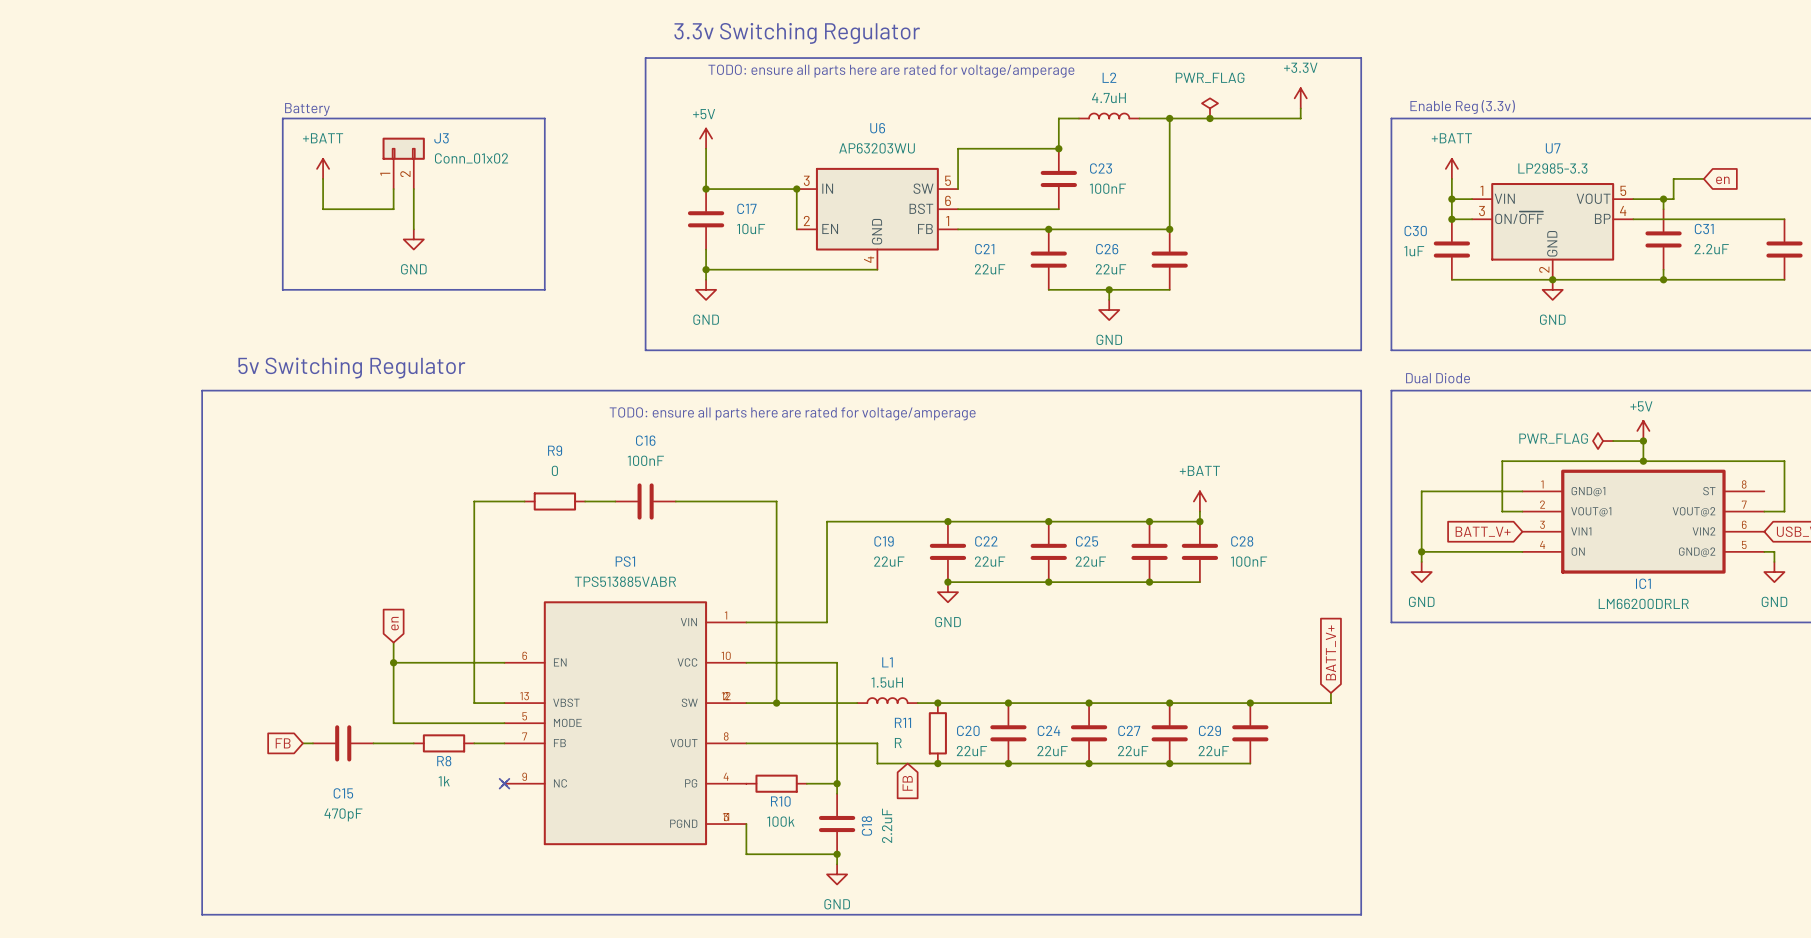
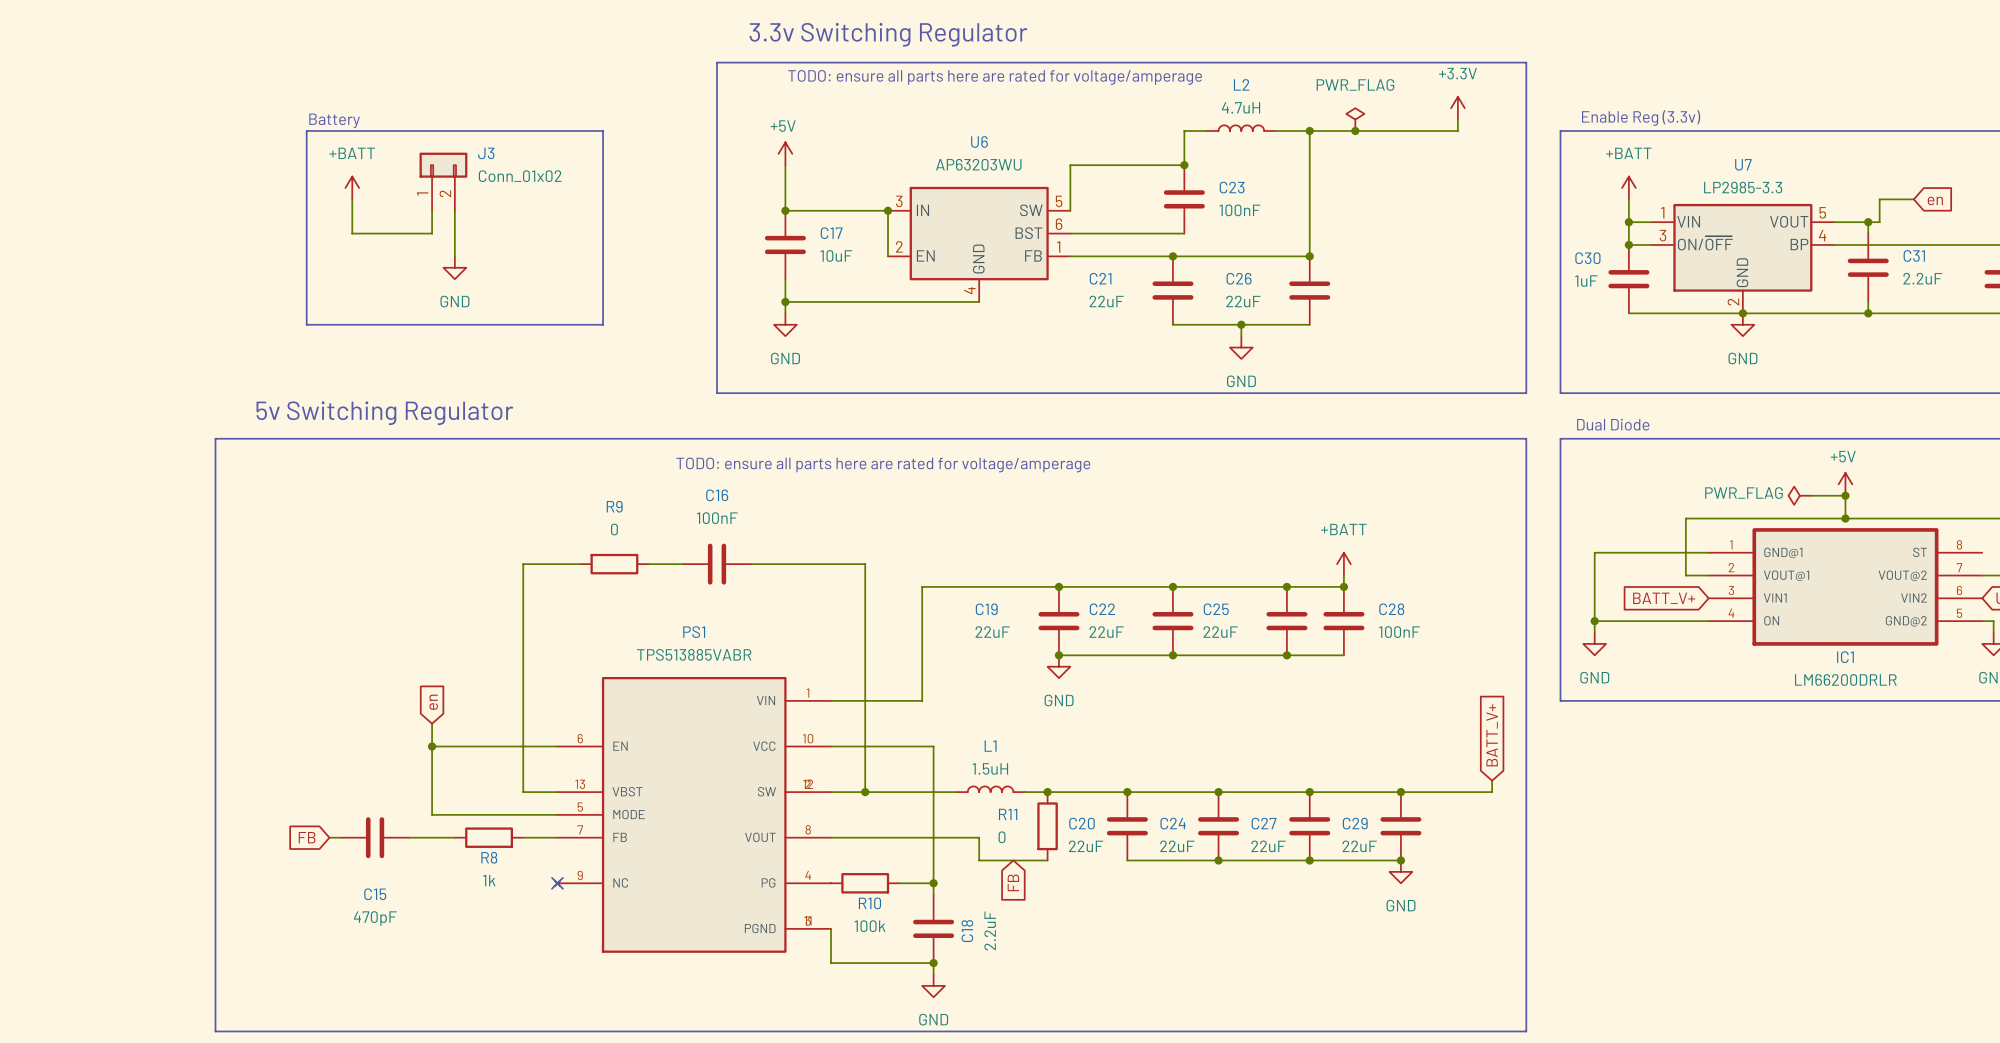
R11 value: R (898, 743) -> 0 (1002, 837)
wire: (937, 763) (1008, 763) -> none
junction: (937, 763) -> none
junction: (1008, 763) -> none
junction: none -> (1400, 860)
power symbol: none -> GND (1400, 871)

